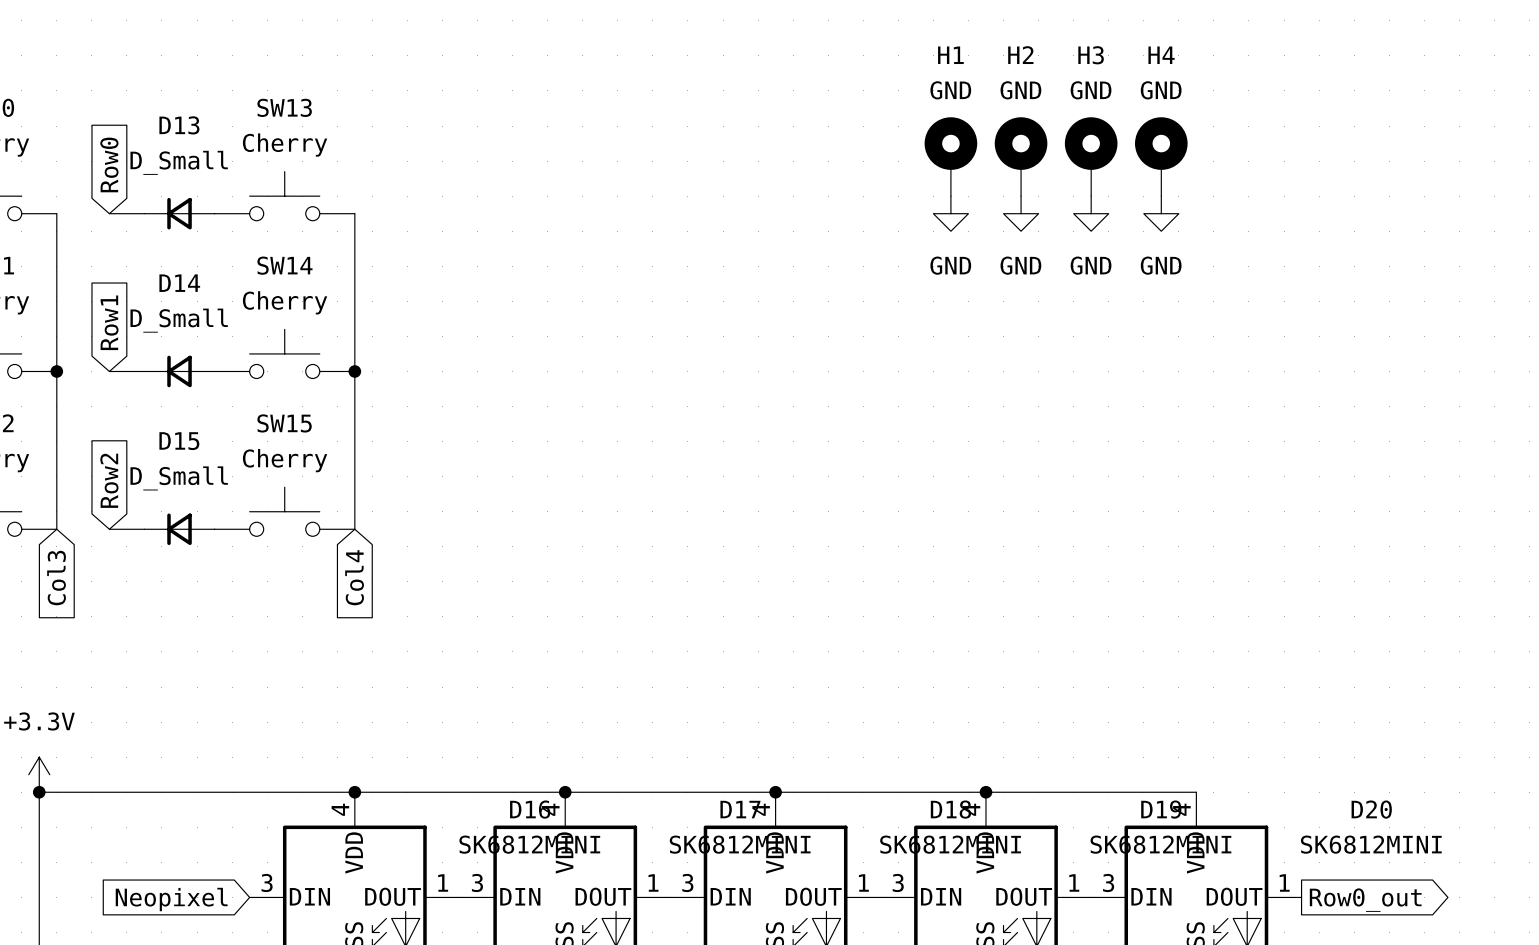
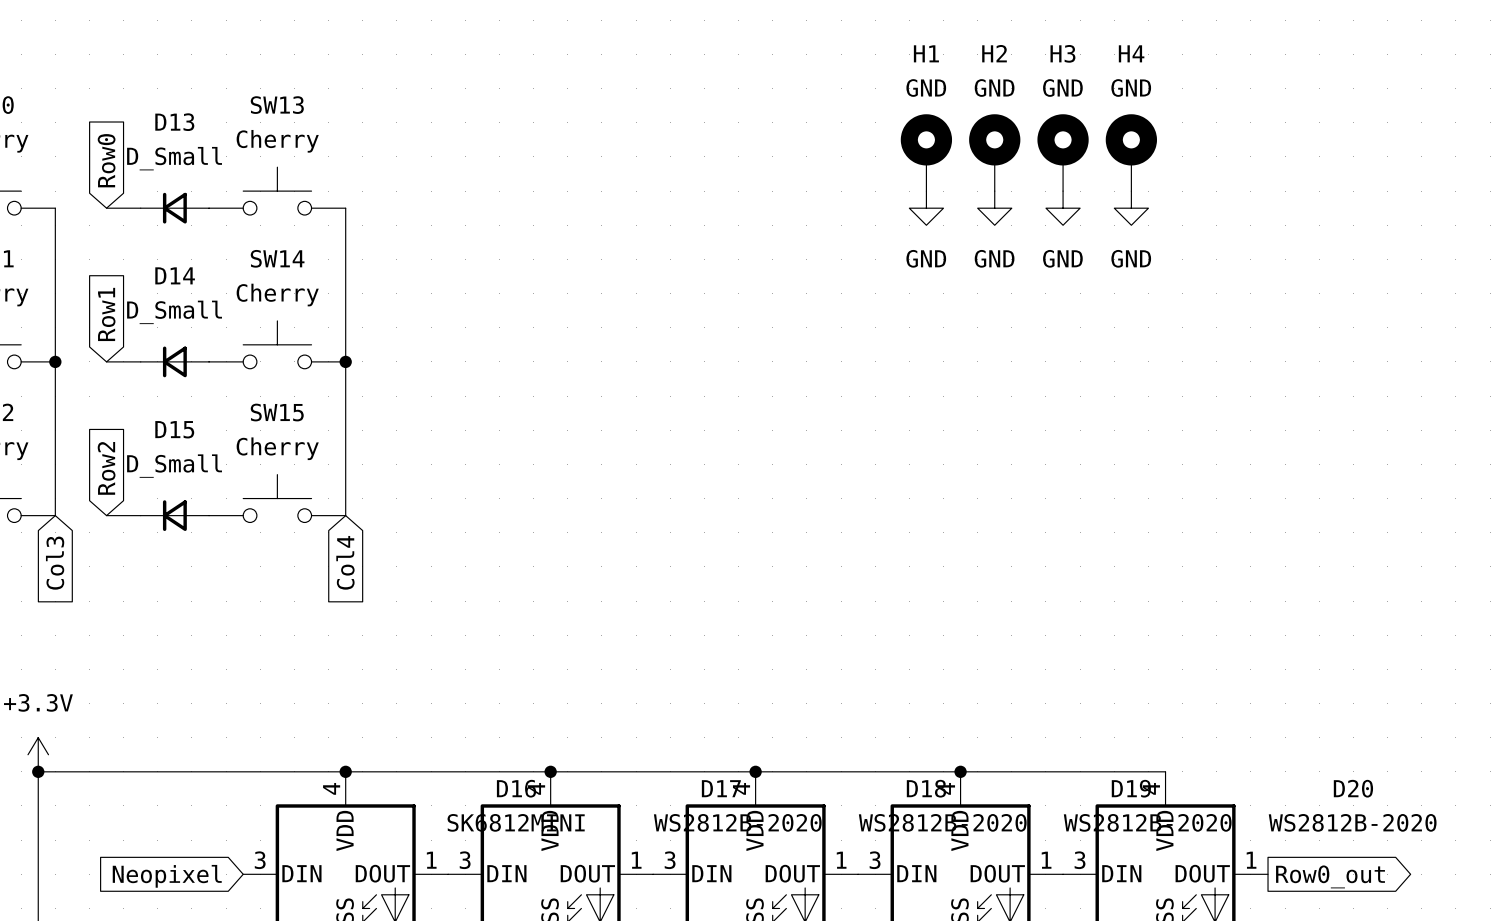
D20 name position: D20 (1371, 809) -> D20 (1353, 788)
D17 value: SK6812MINI (740, 844) -> WS2812B-2020 (737, 822)
D18 value: SK6812MINI (950, 844) -> WS2812B-2020 (942, 822)
D19 value: SK6812MINI (1160, 844) -> WS2812B-2020 (1147, 822)
D20 value: SK6812MINI (1371, 844) -> WS2812B-2020 (1352, 822)

